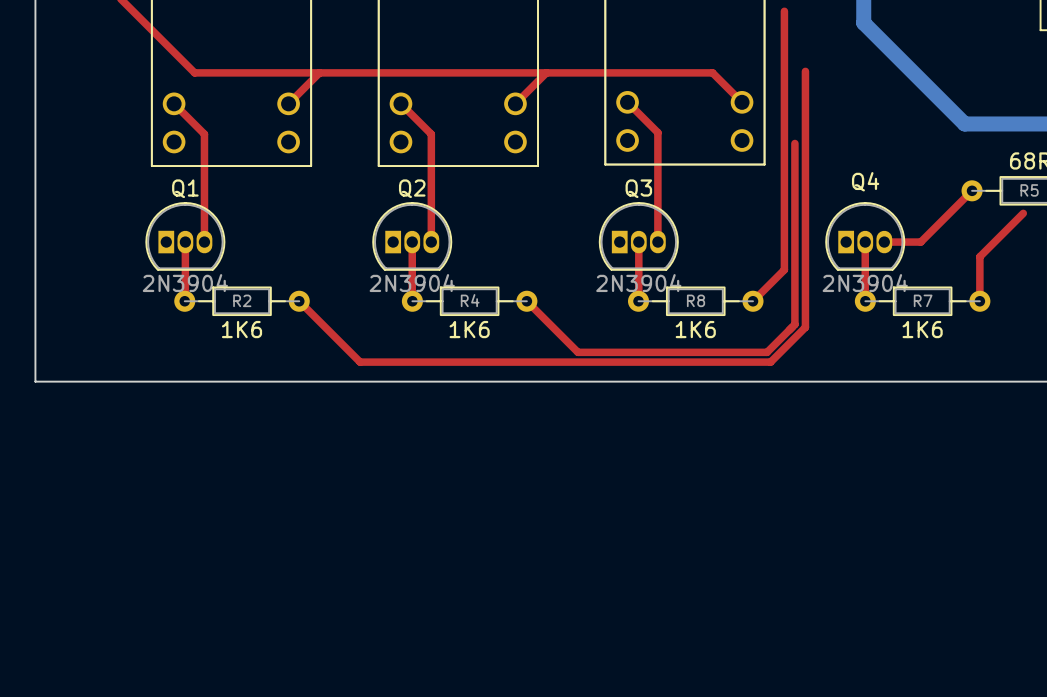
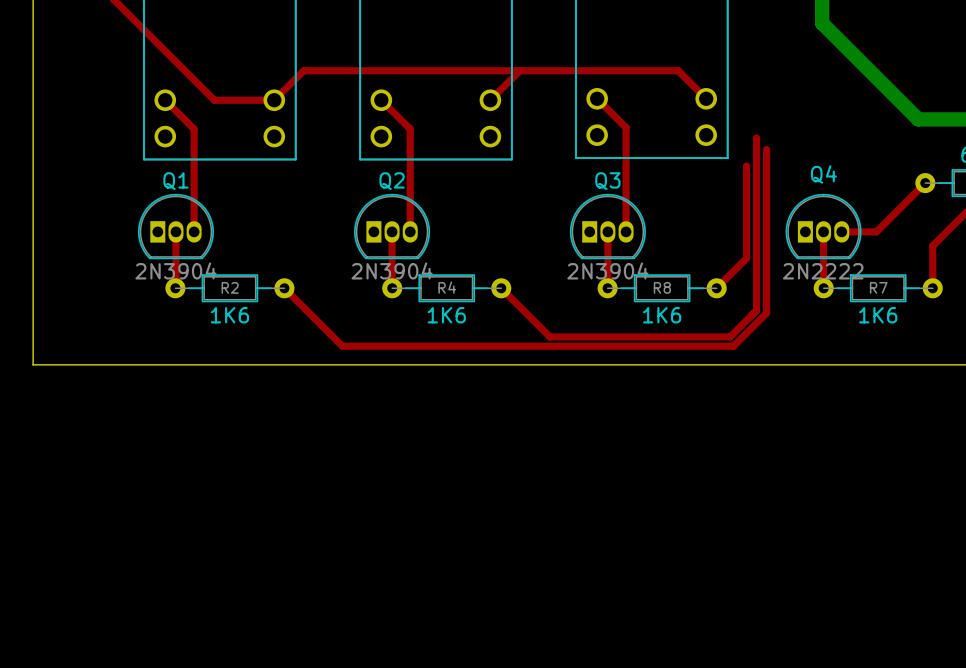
top track: (784, 11) (784, 172) -> none
top track: (805, 71) (805, 155) -> none
top track: (194, 72) (319, 72) -> (184, 70) (214, 100) (274, 100)
Q4 value: 2N3904 (865, 283) -> 2N2222 (823, 271)

